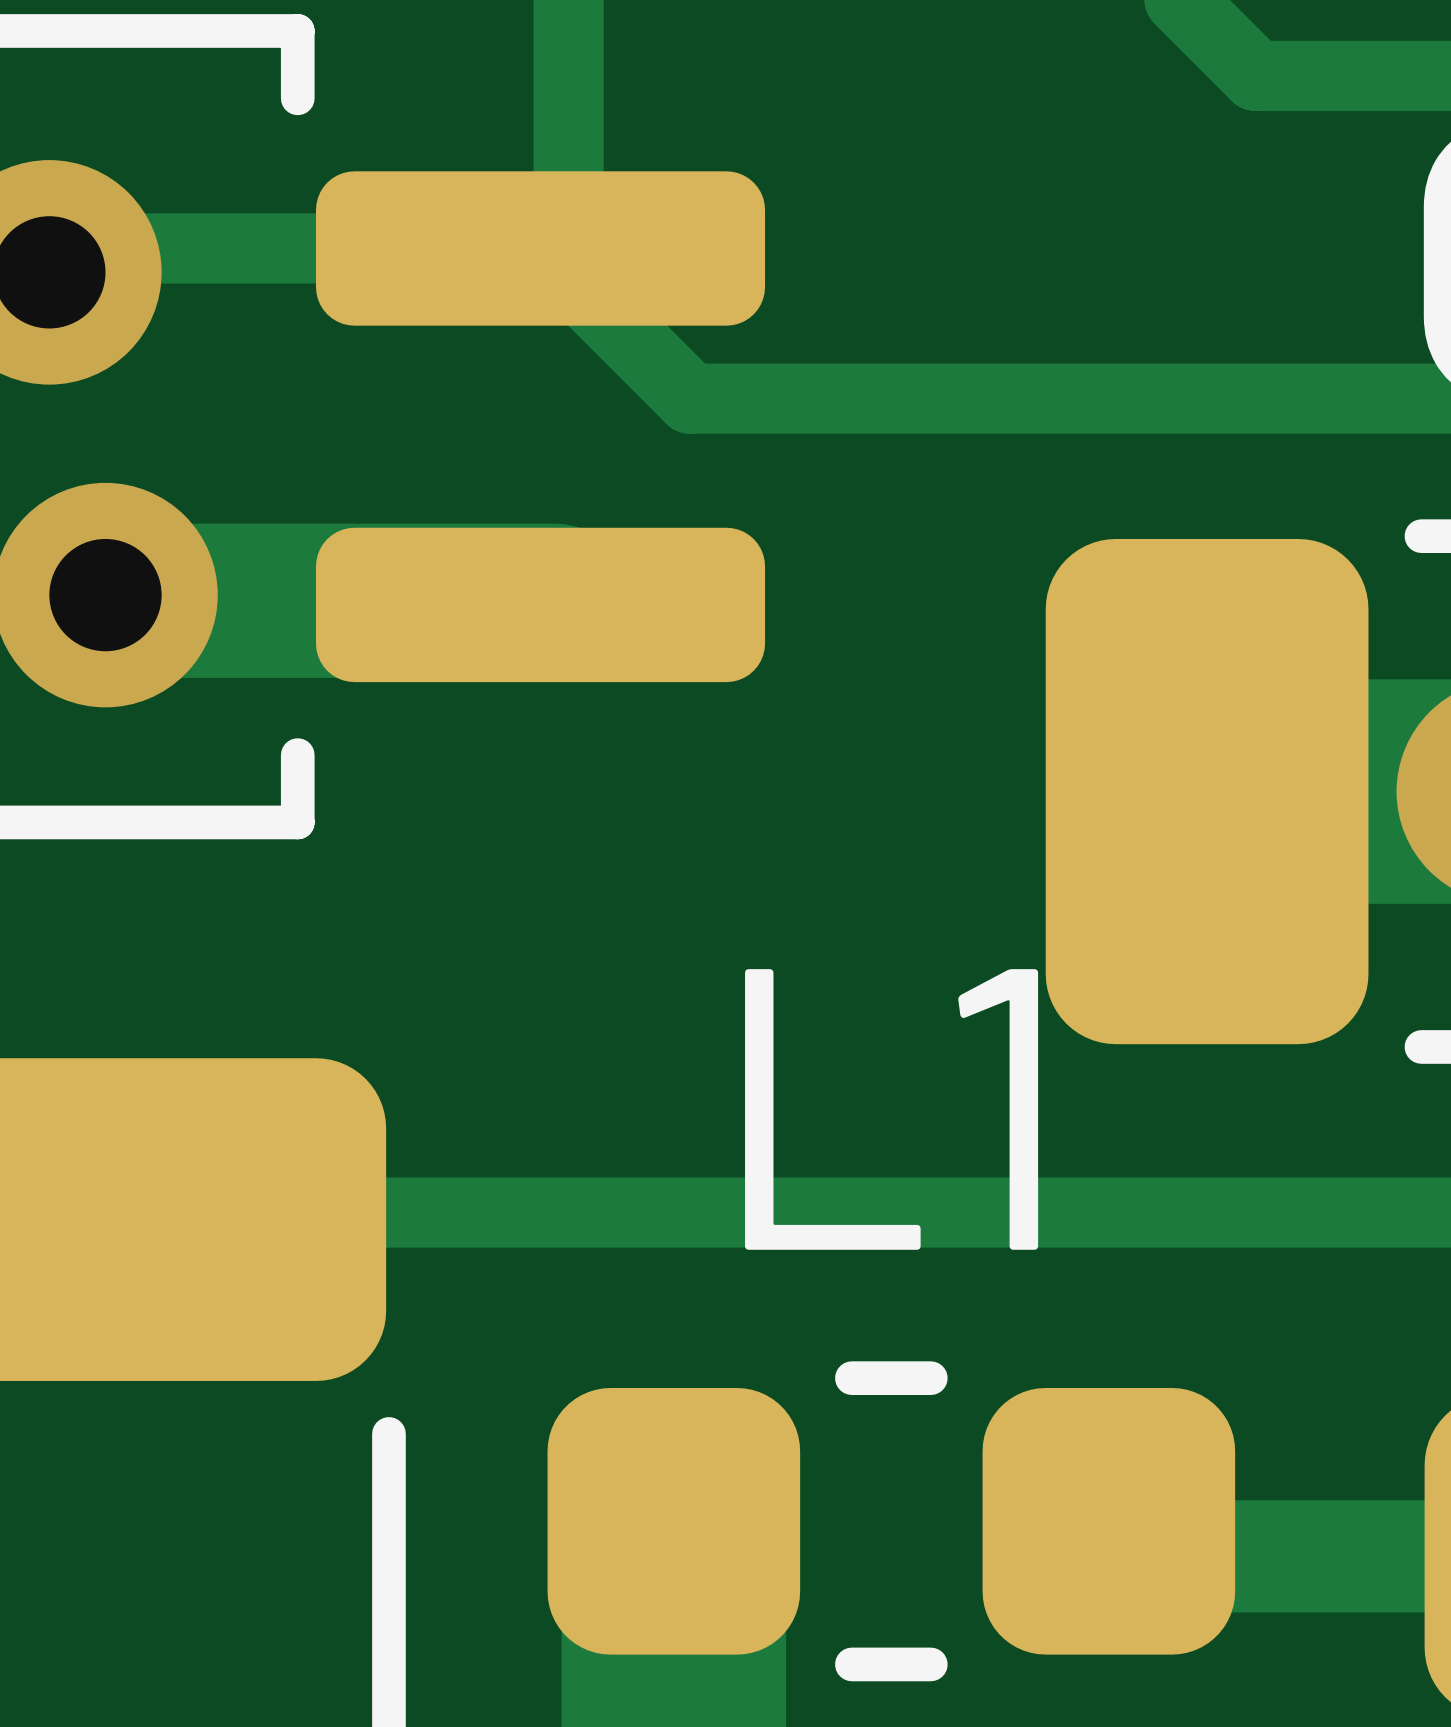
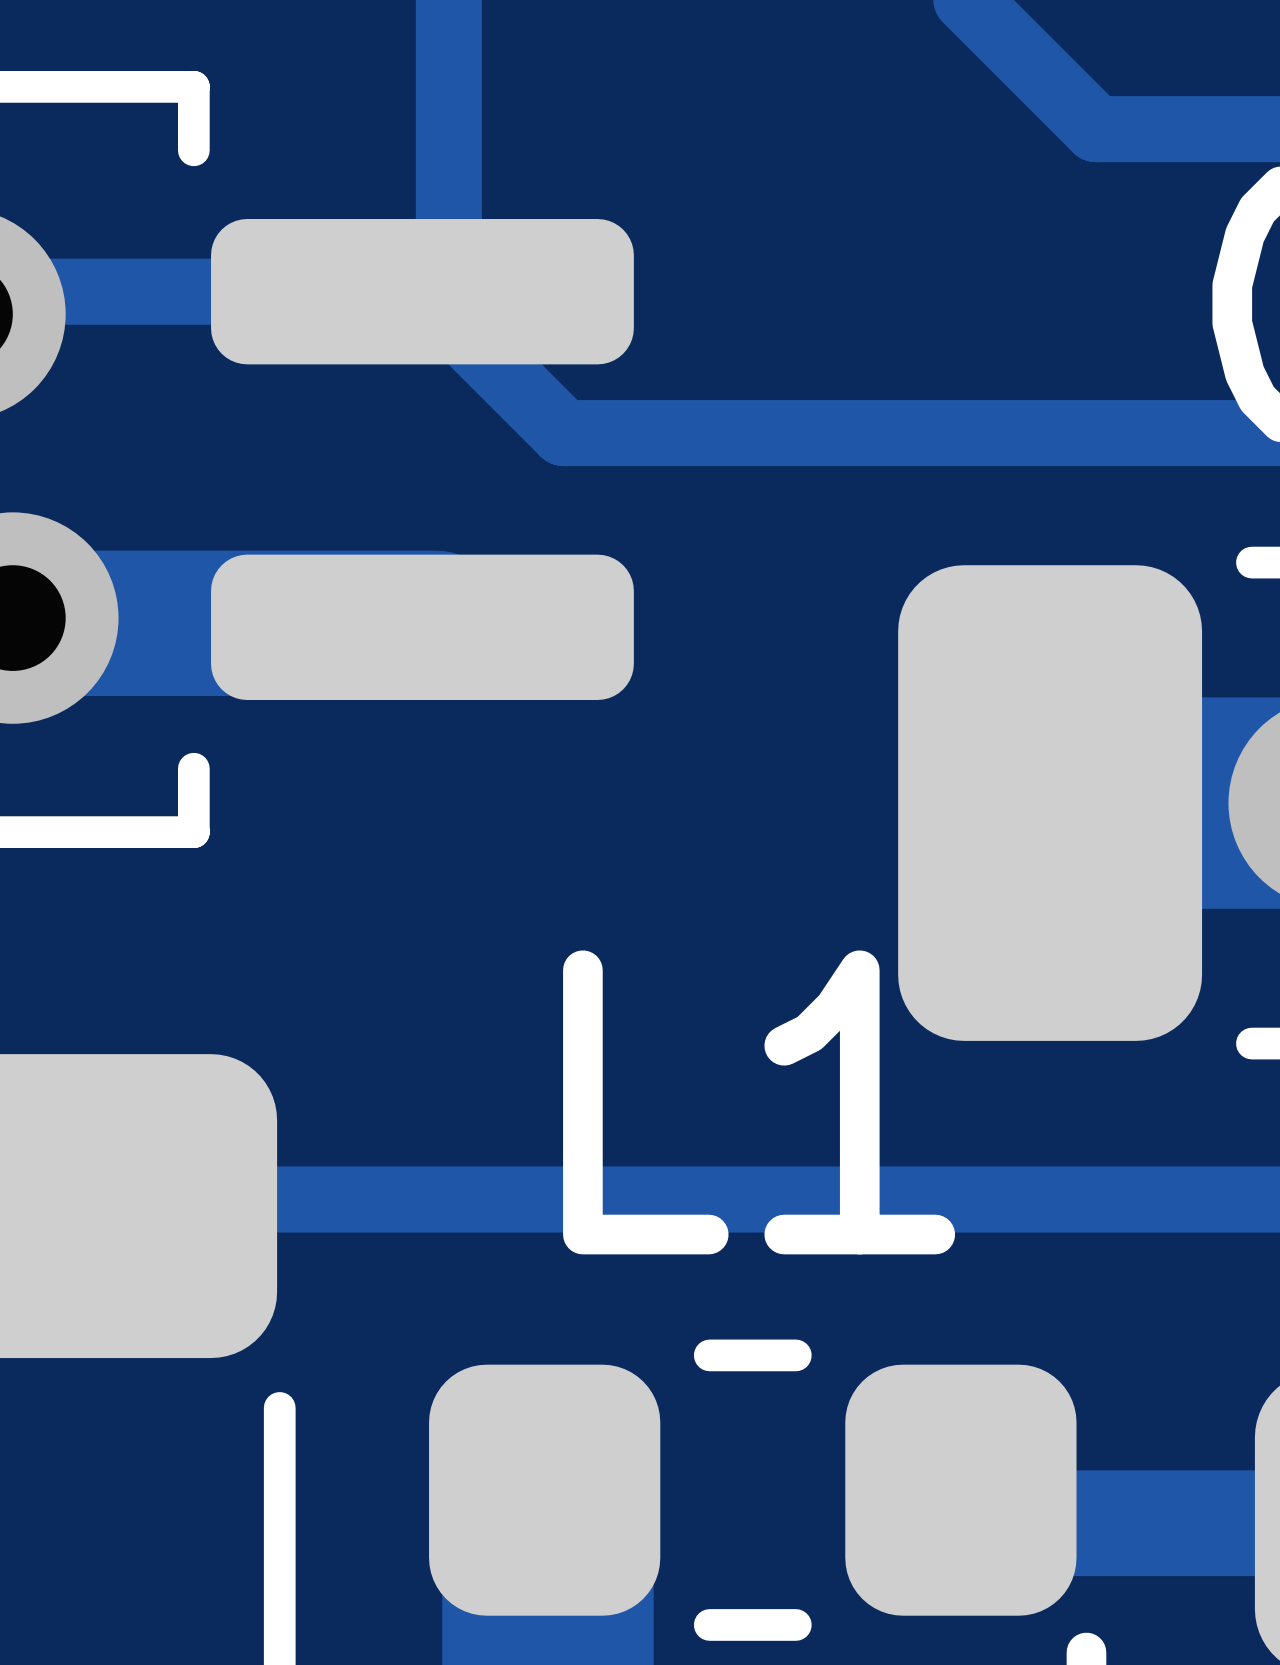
L1 footprint: [547, 1361, 1236, 1682] -> [429, 1339, 1077, 1641]

